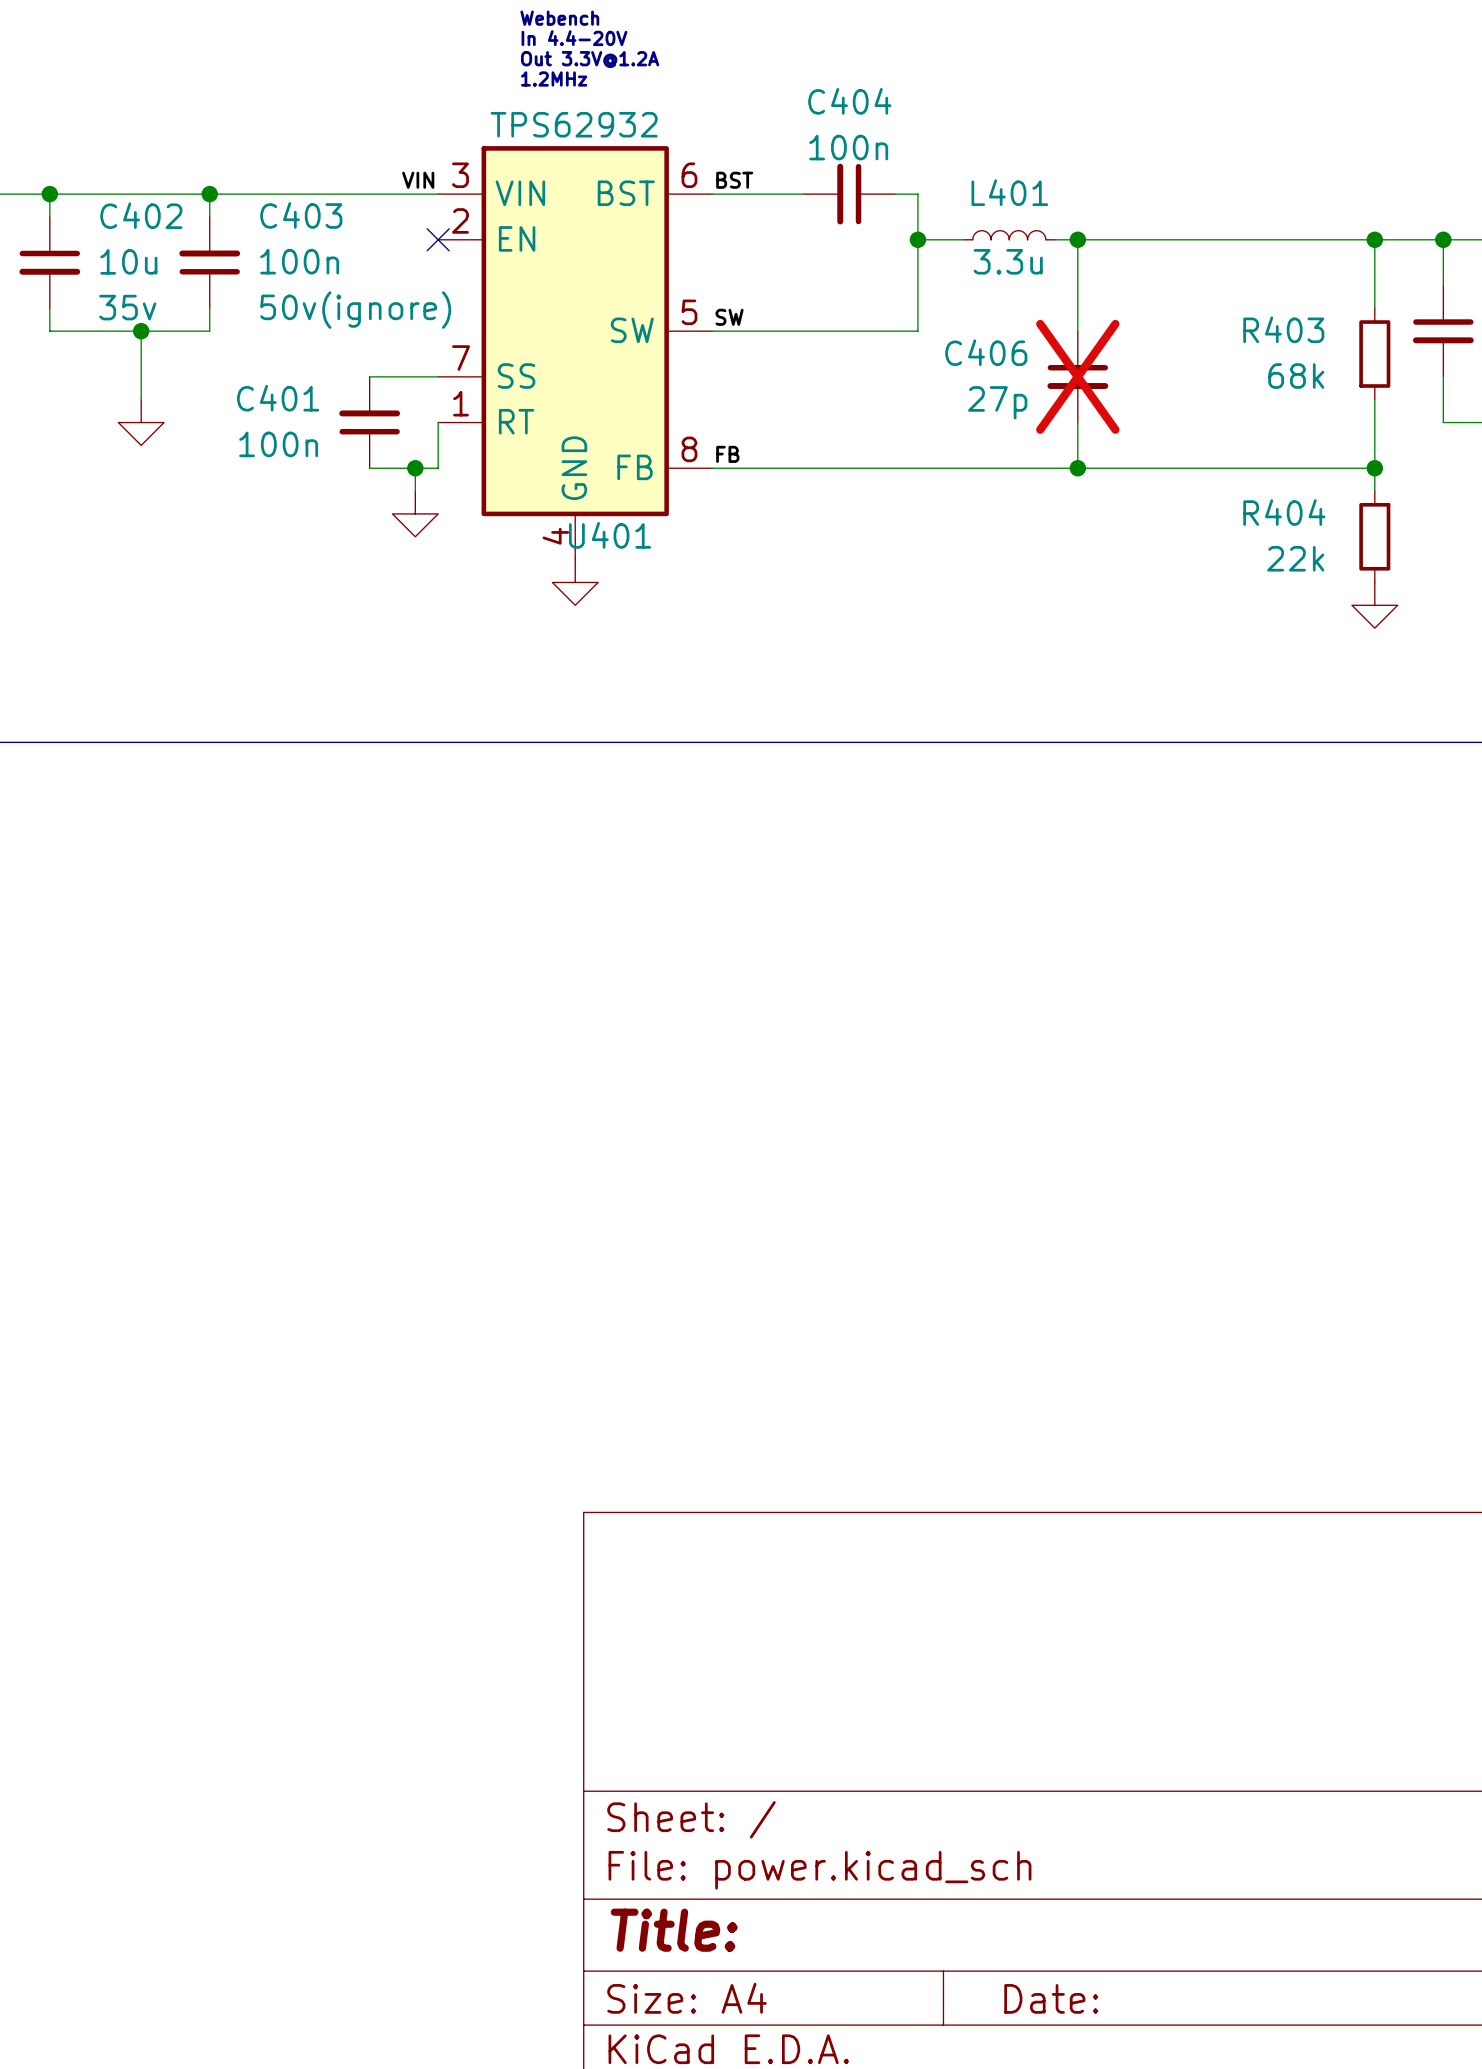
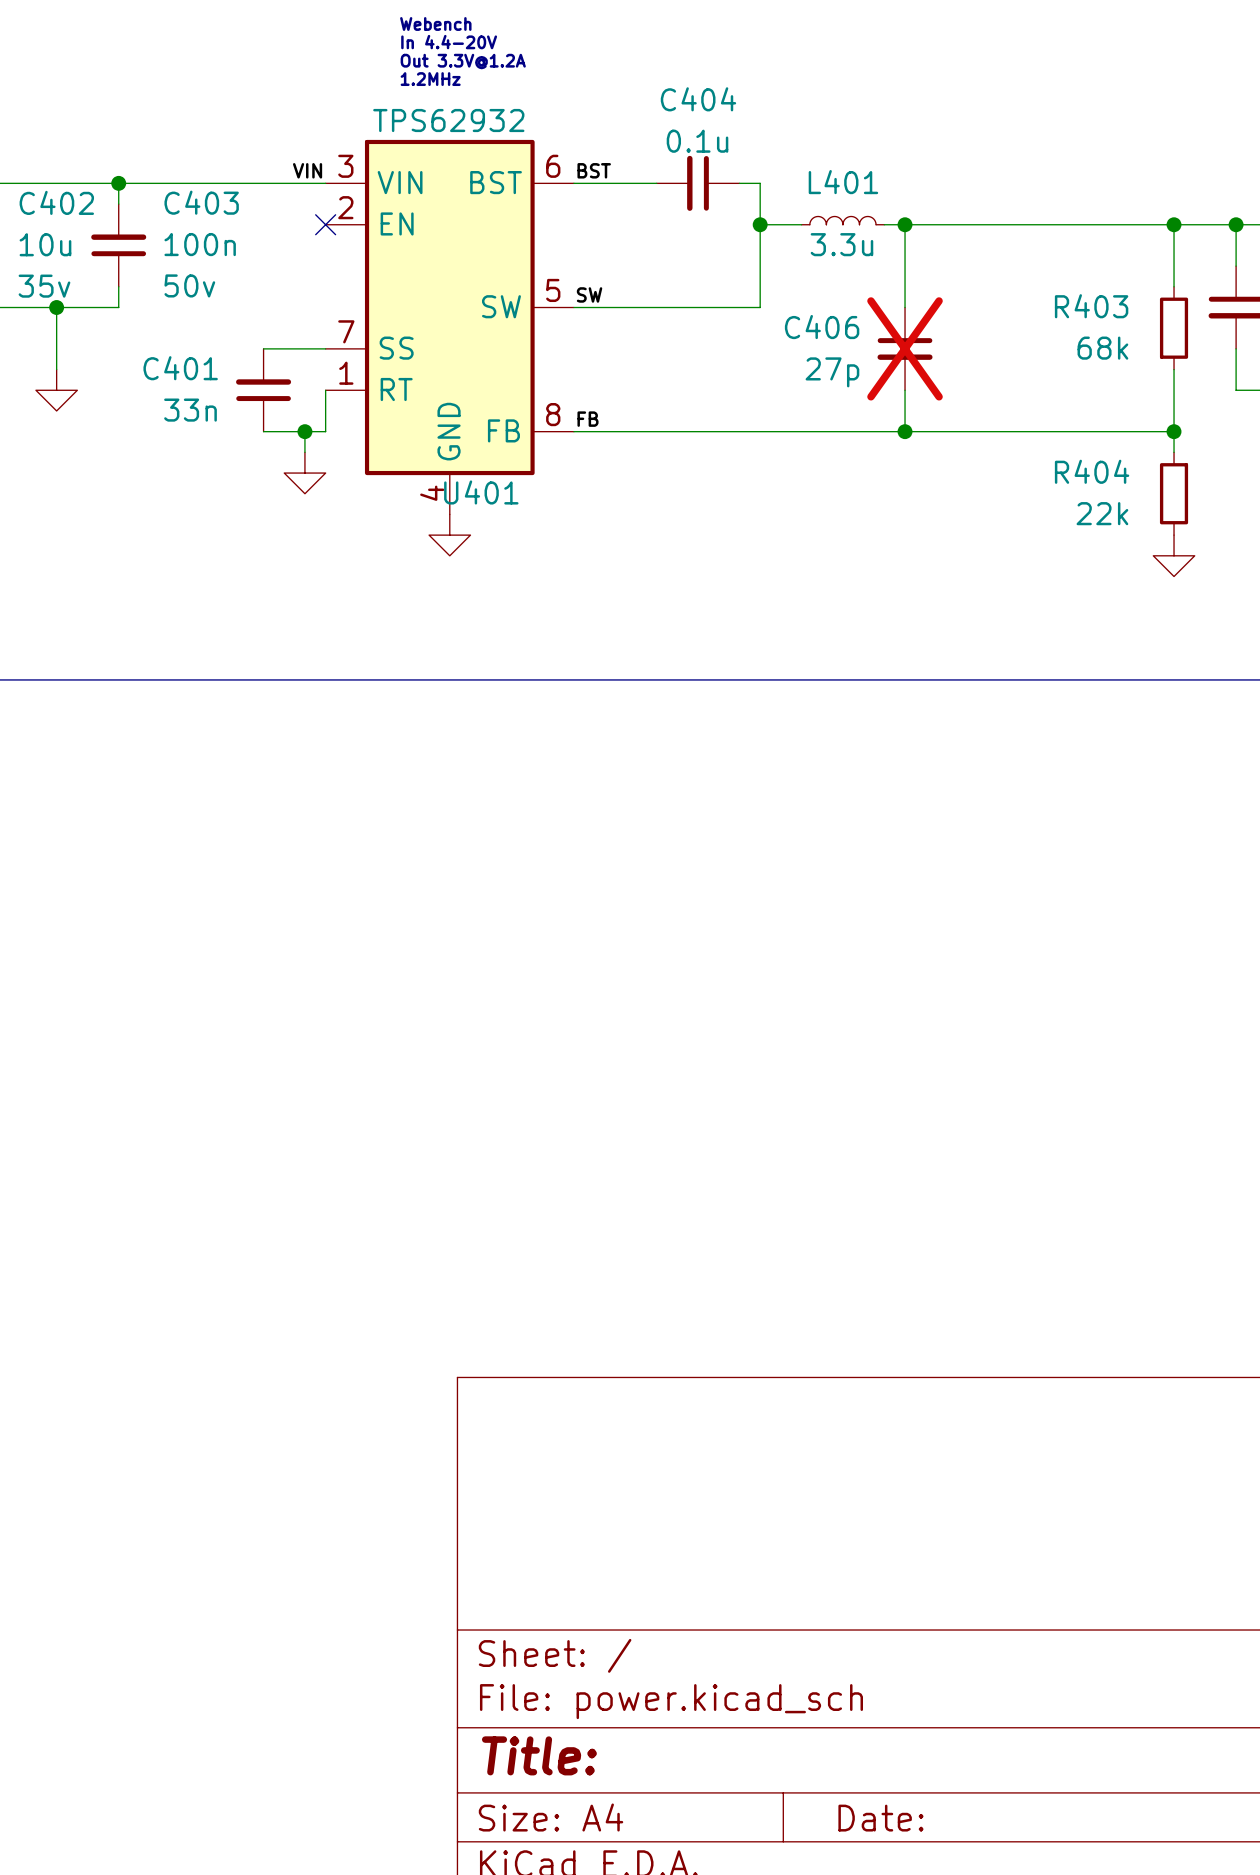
C404 value: 100n (848, 147) -> 0.1u (697, 141)
C403 text: 50v(ignore) (355, 310) -> 50v (189, 285)
C401 value: 100n (278, 444) -> 33n (190, 410)

